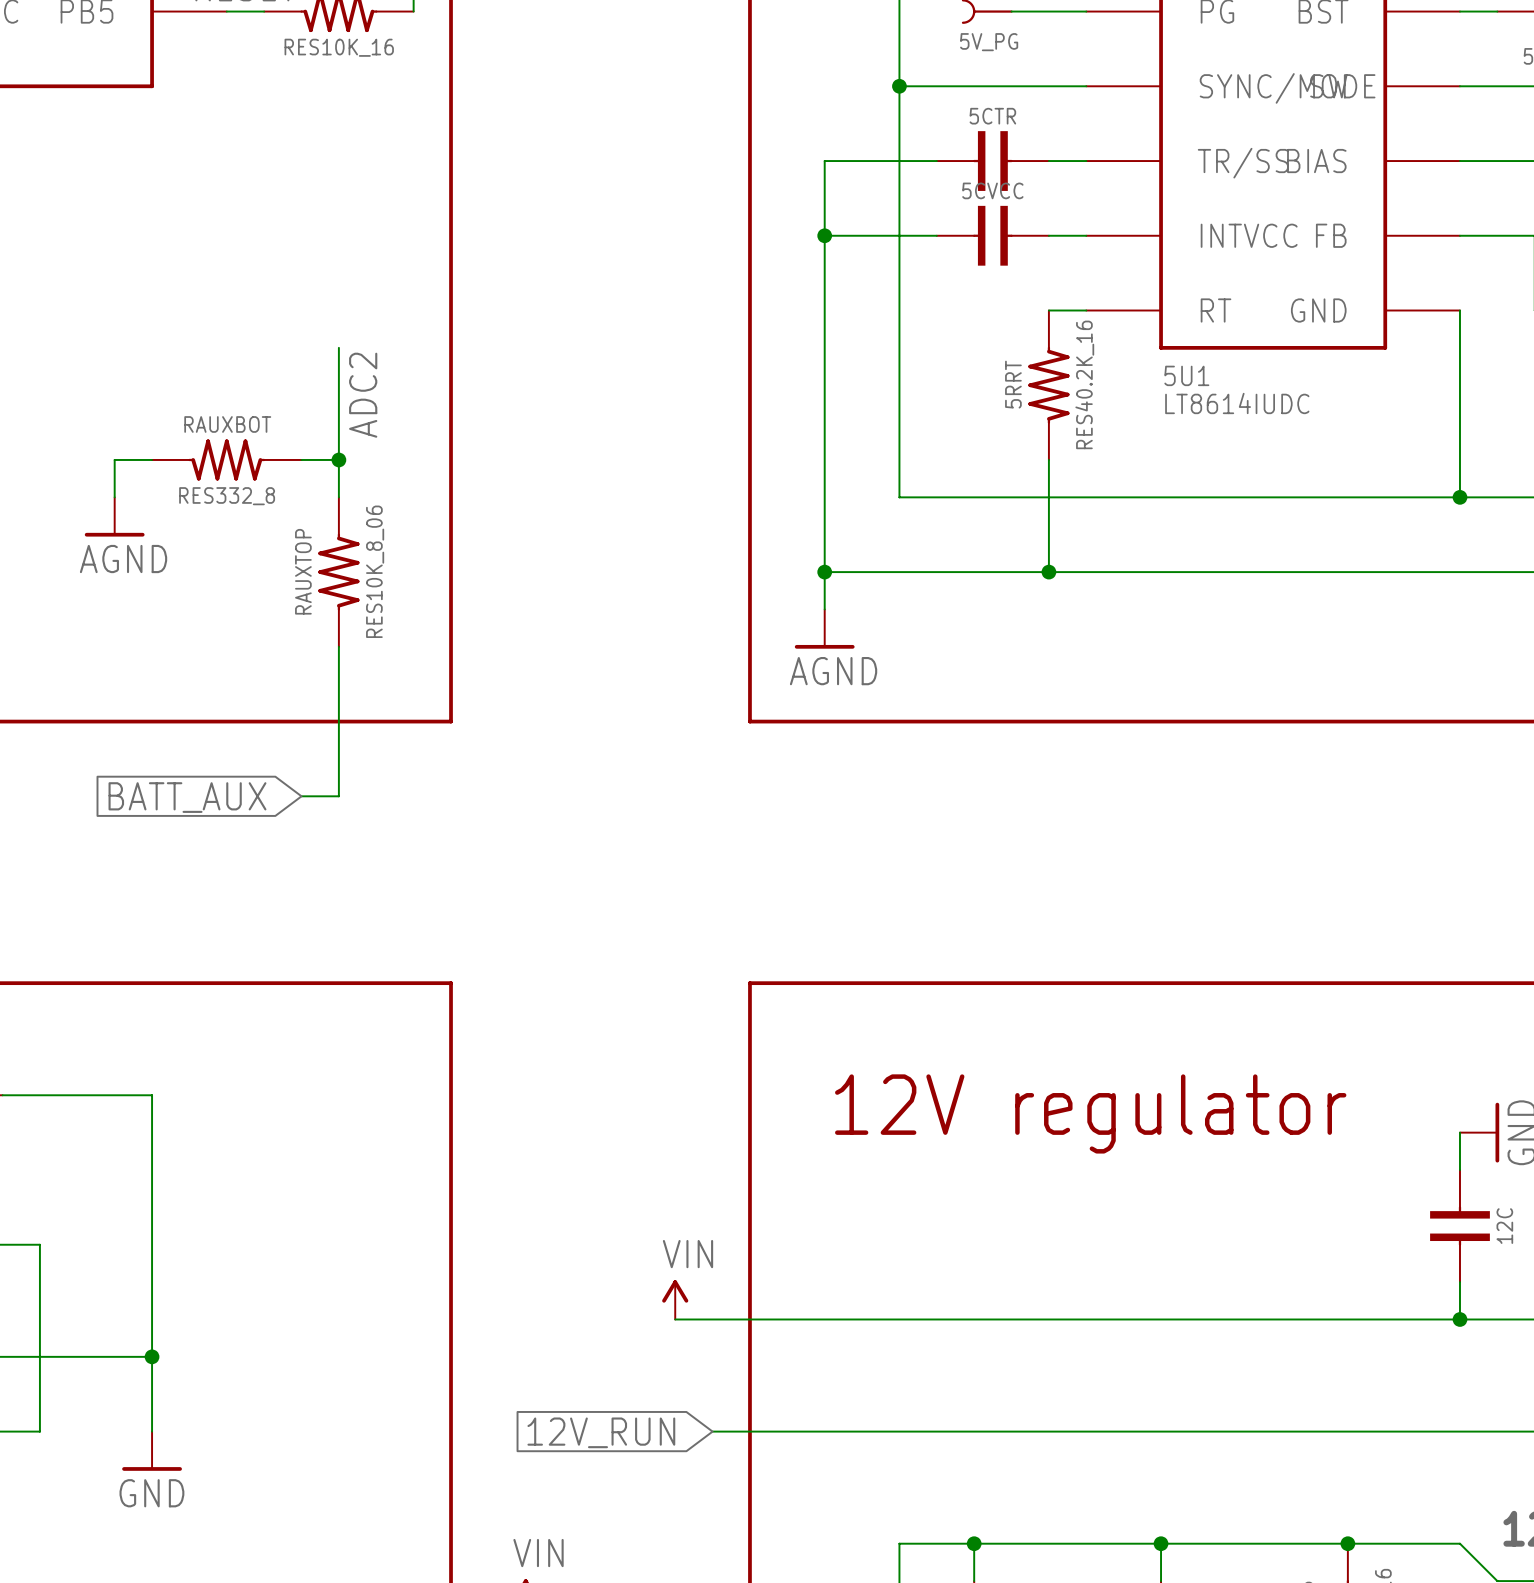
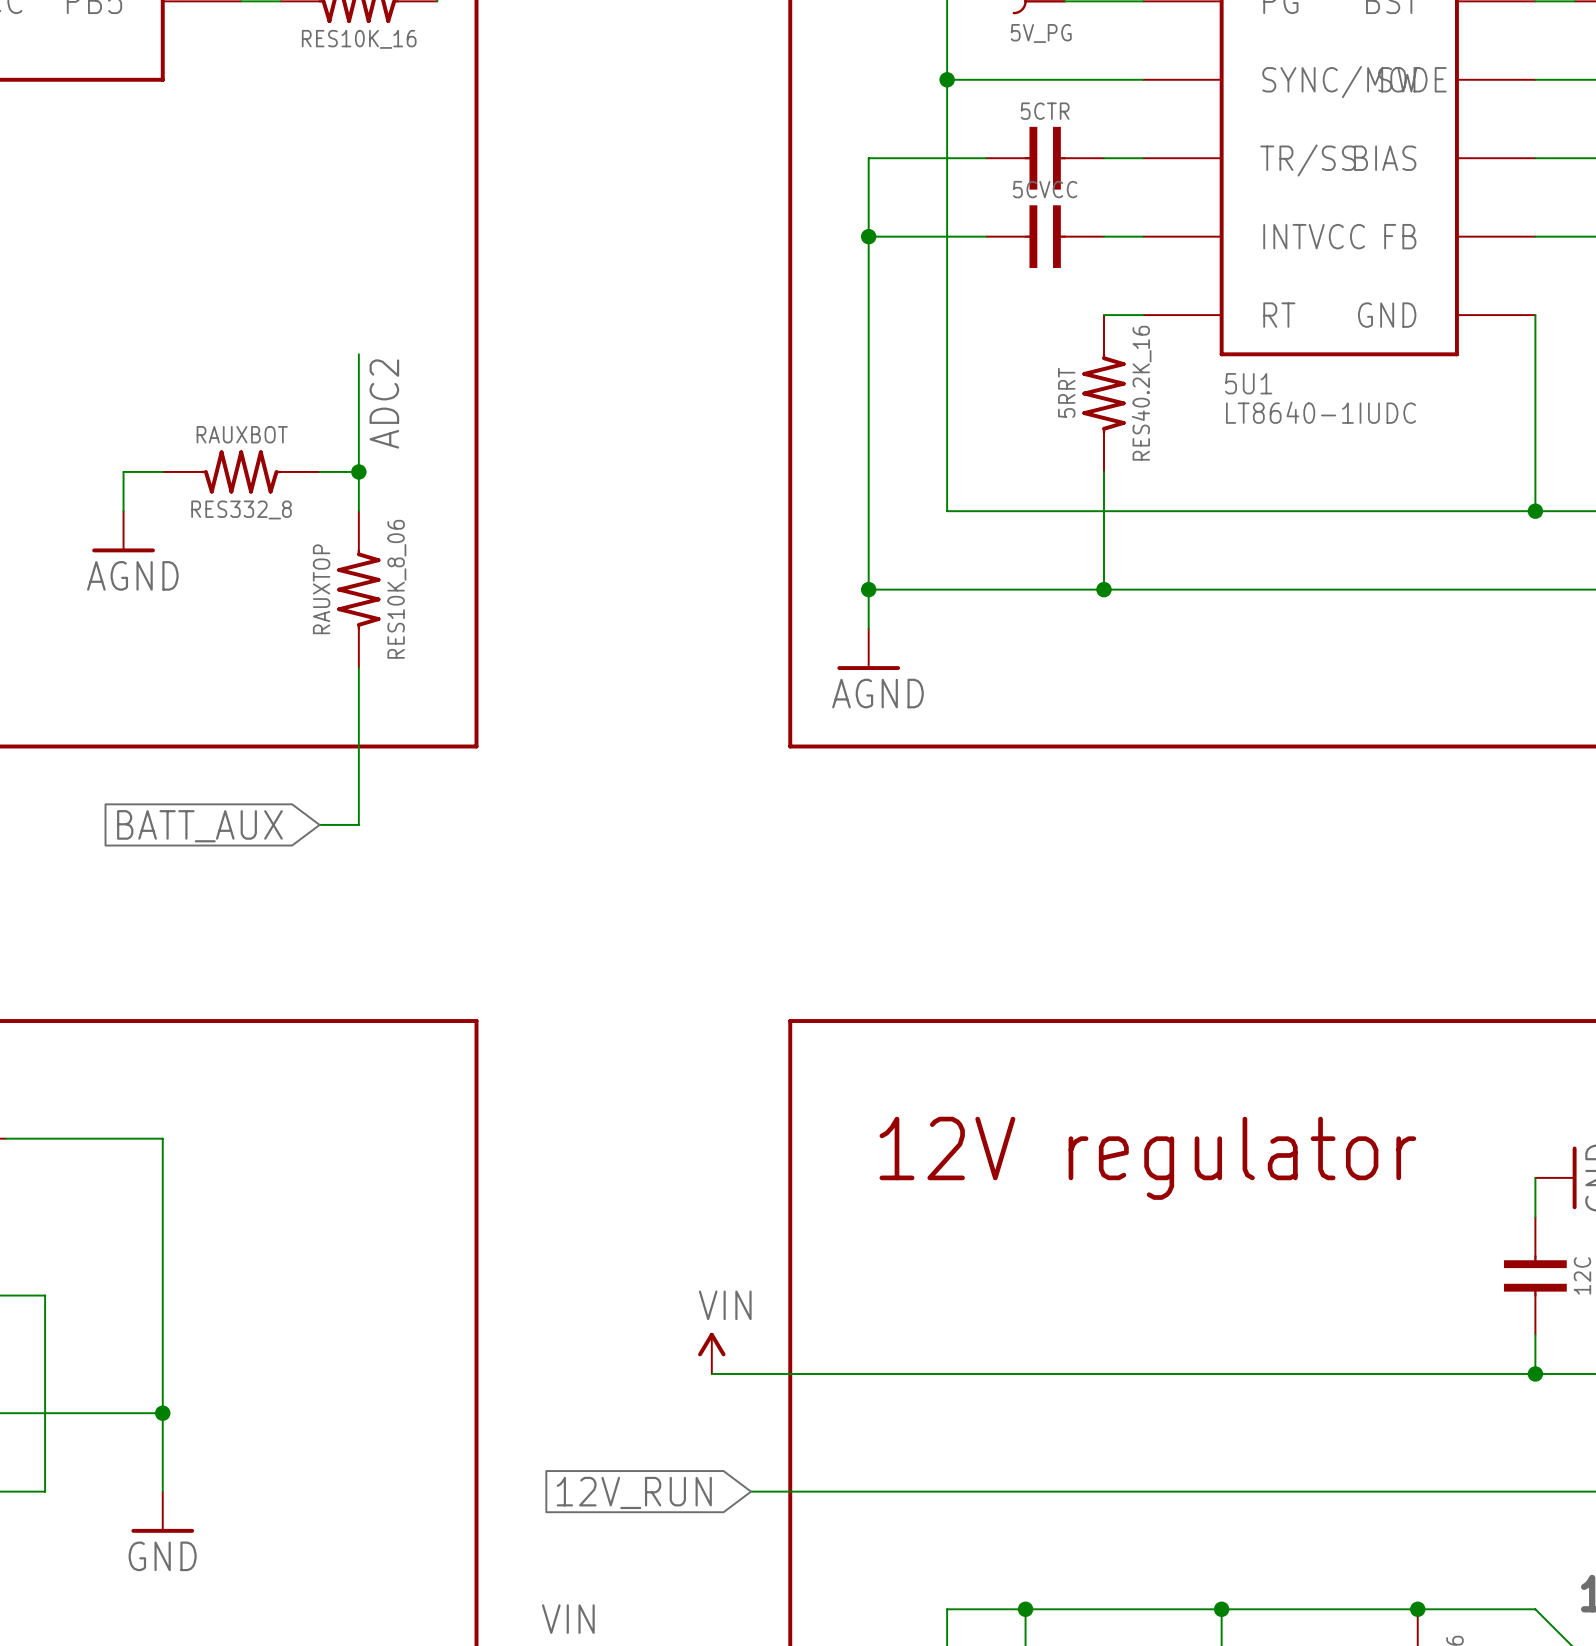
5U1 value: LT8614IUDC (1237, 403) -> LT8640-1IUDC (1321, 412)

